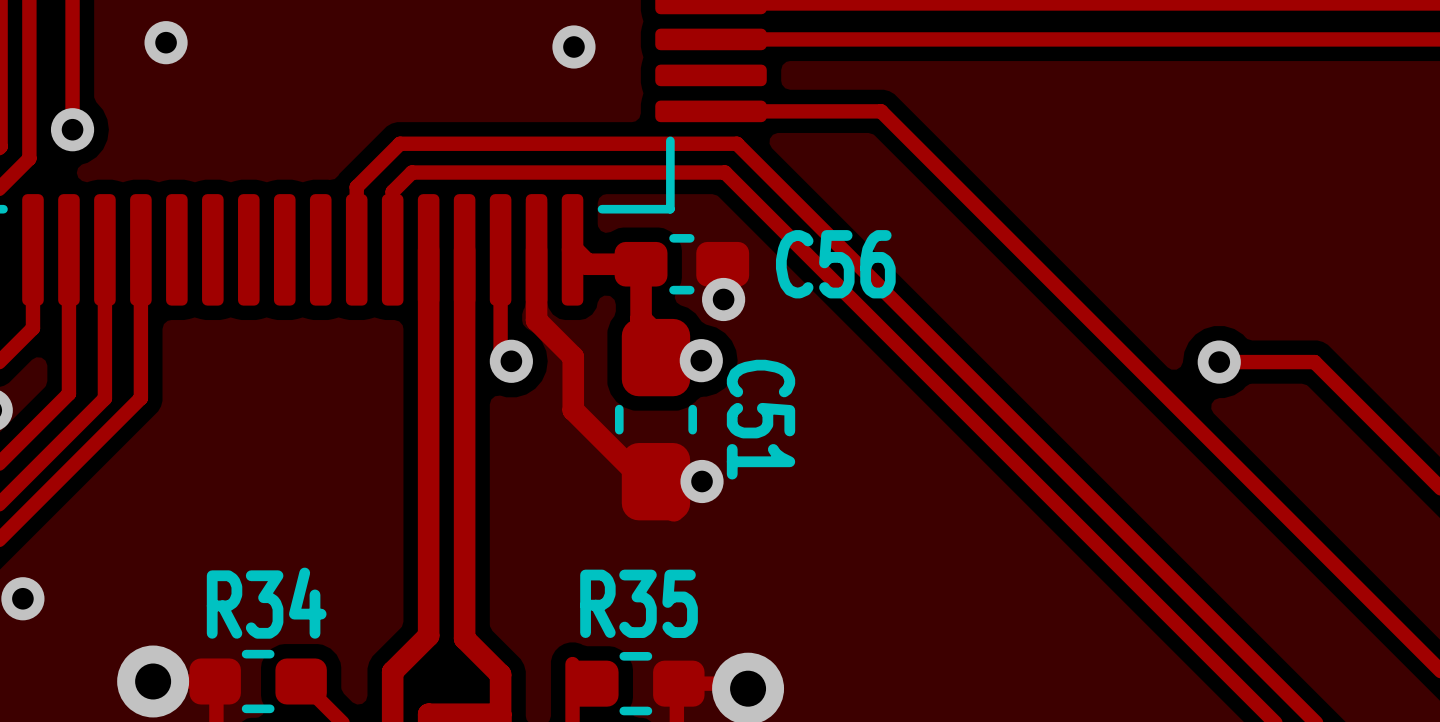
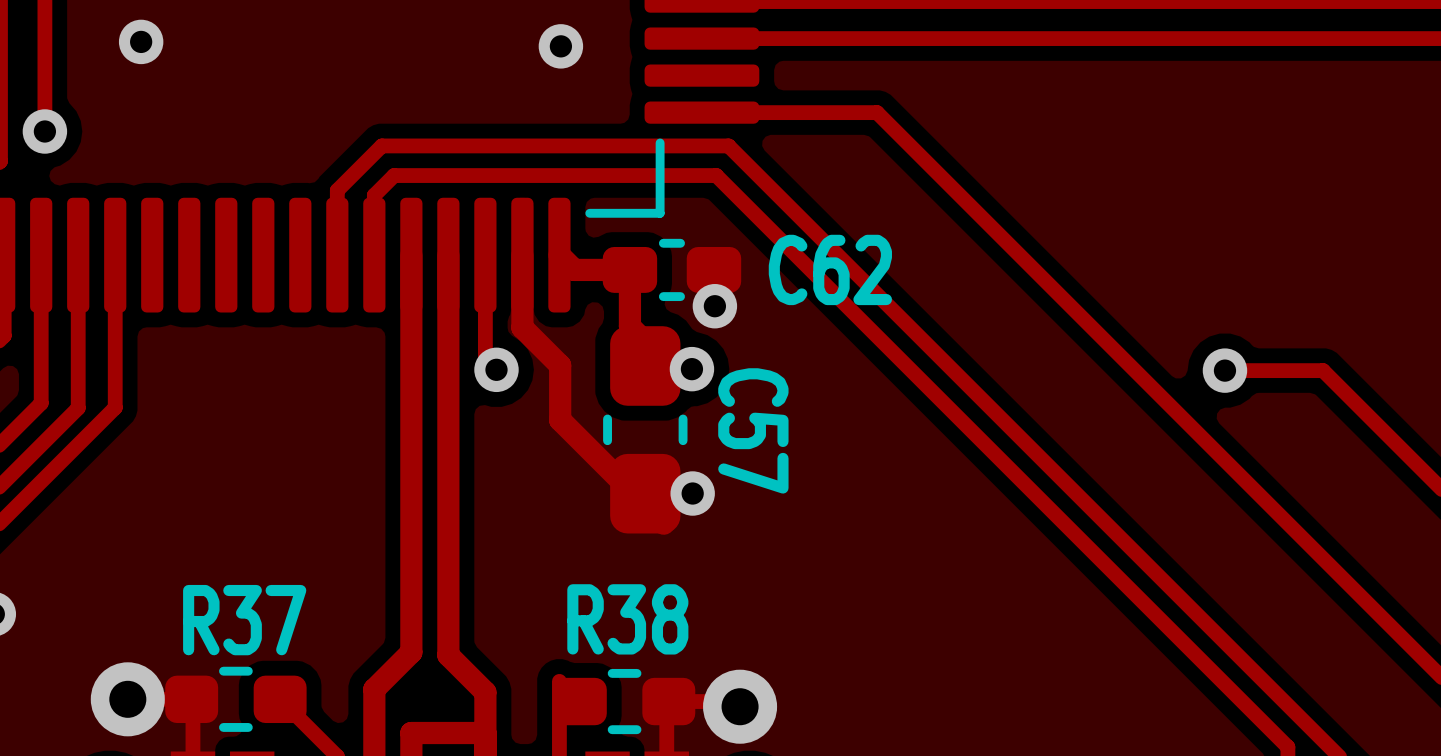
C56 name: C56 (835, 264) -> C62 (830, 269)
C51 name: C51 (761, 419) -> C57 (753, 430)
R34 name: R34 (266, 603) -> R37 (244, 620)
R35 name: R35 (639, 603) -> R38 (627, 619)

